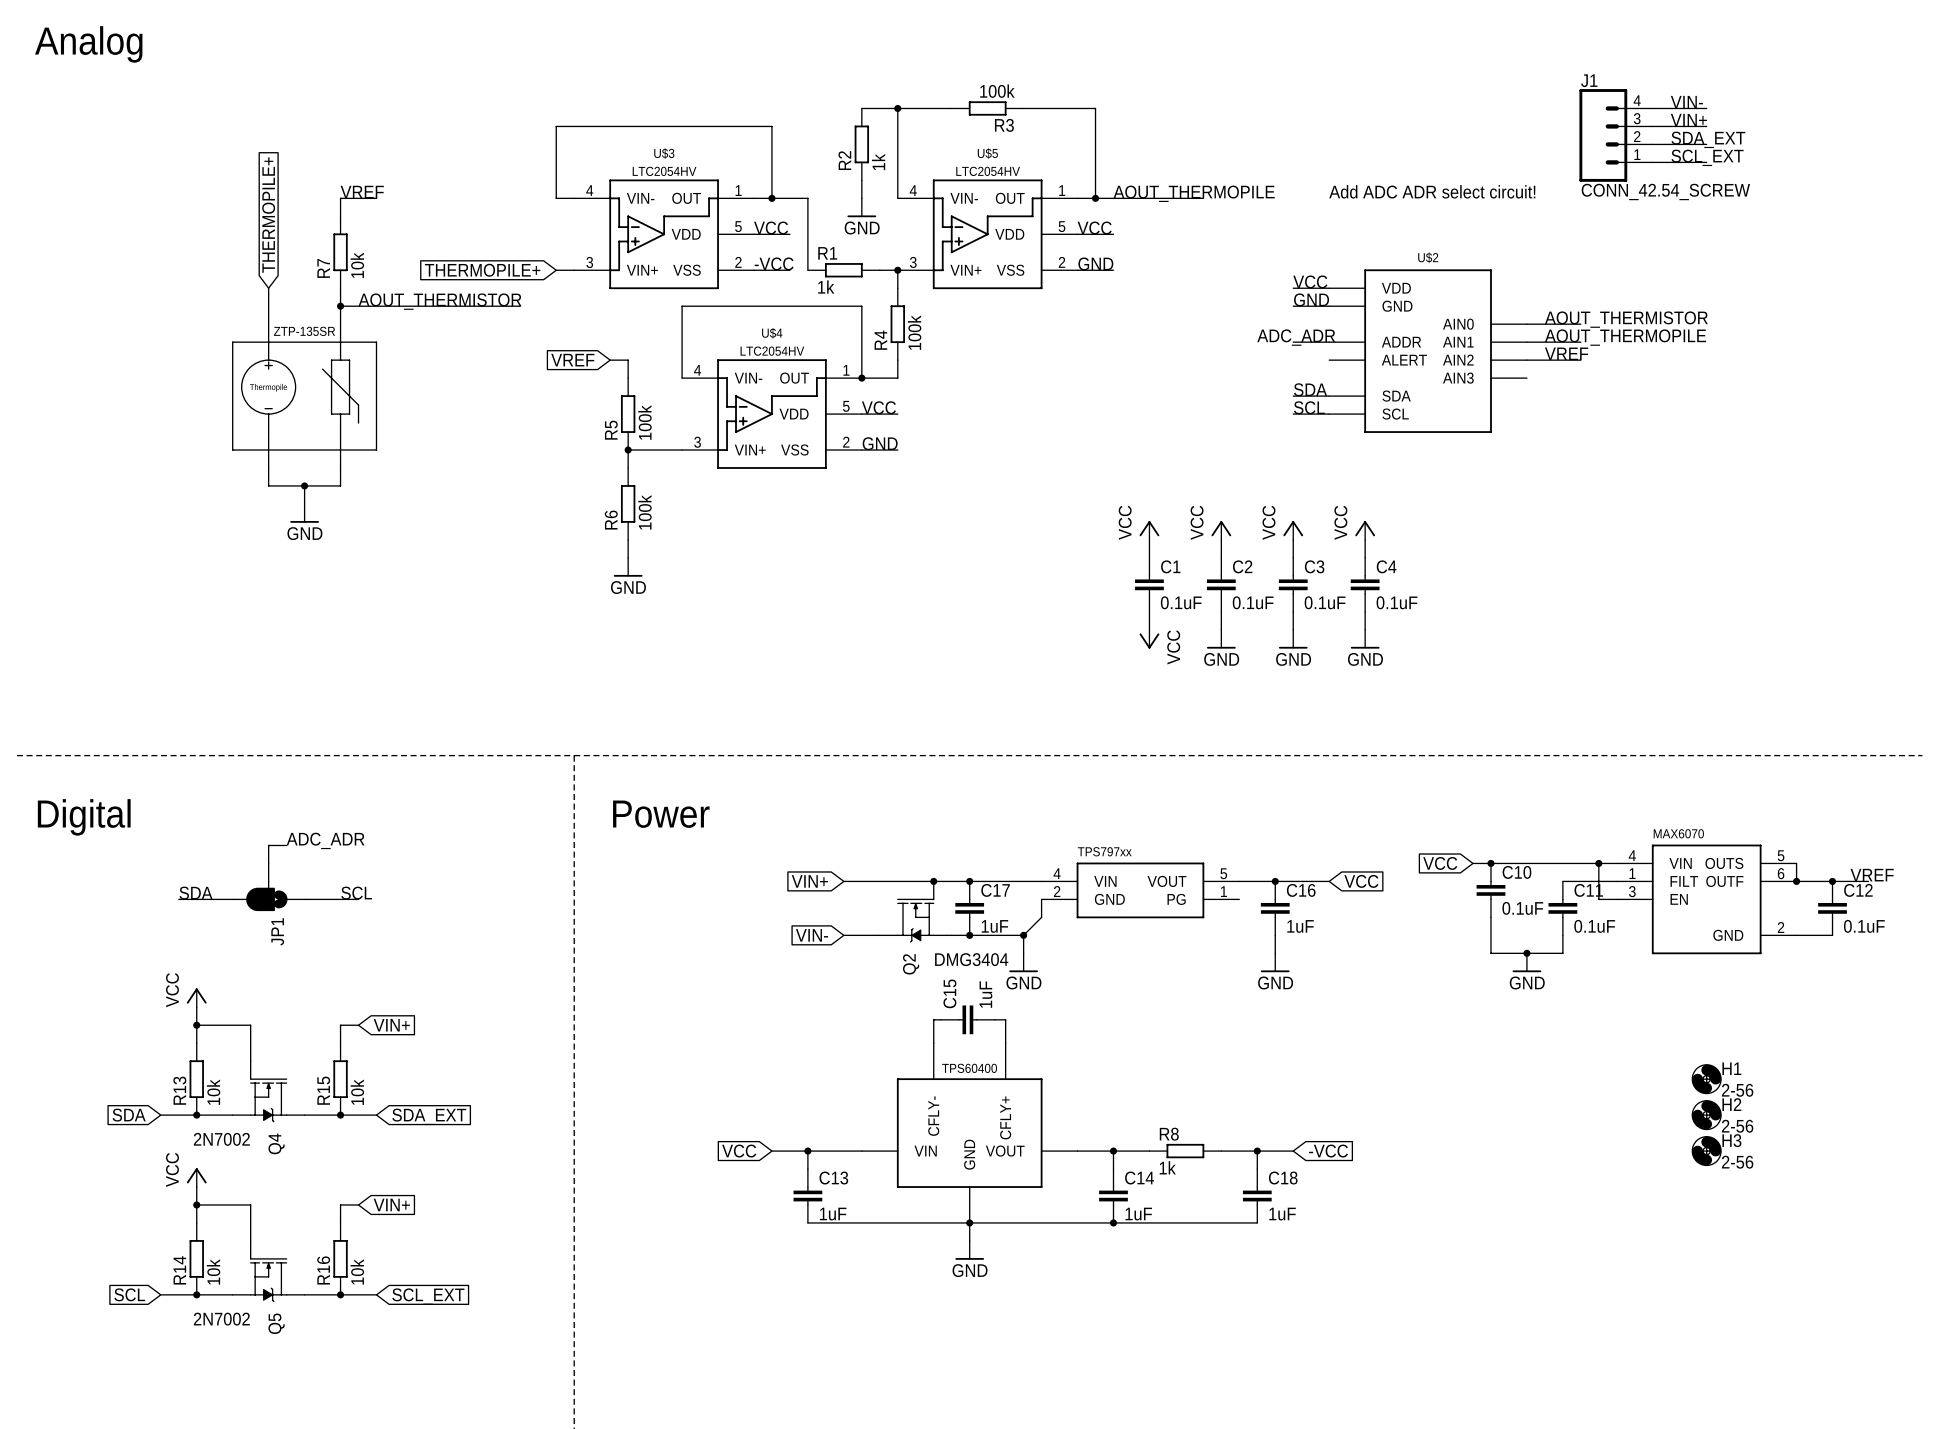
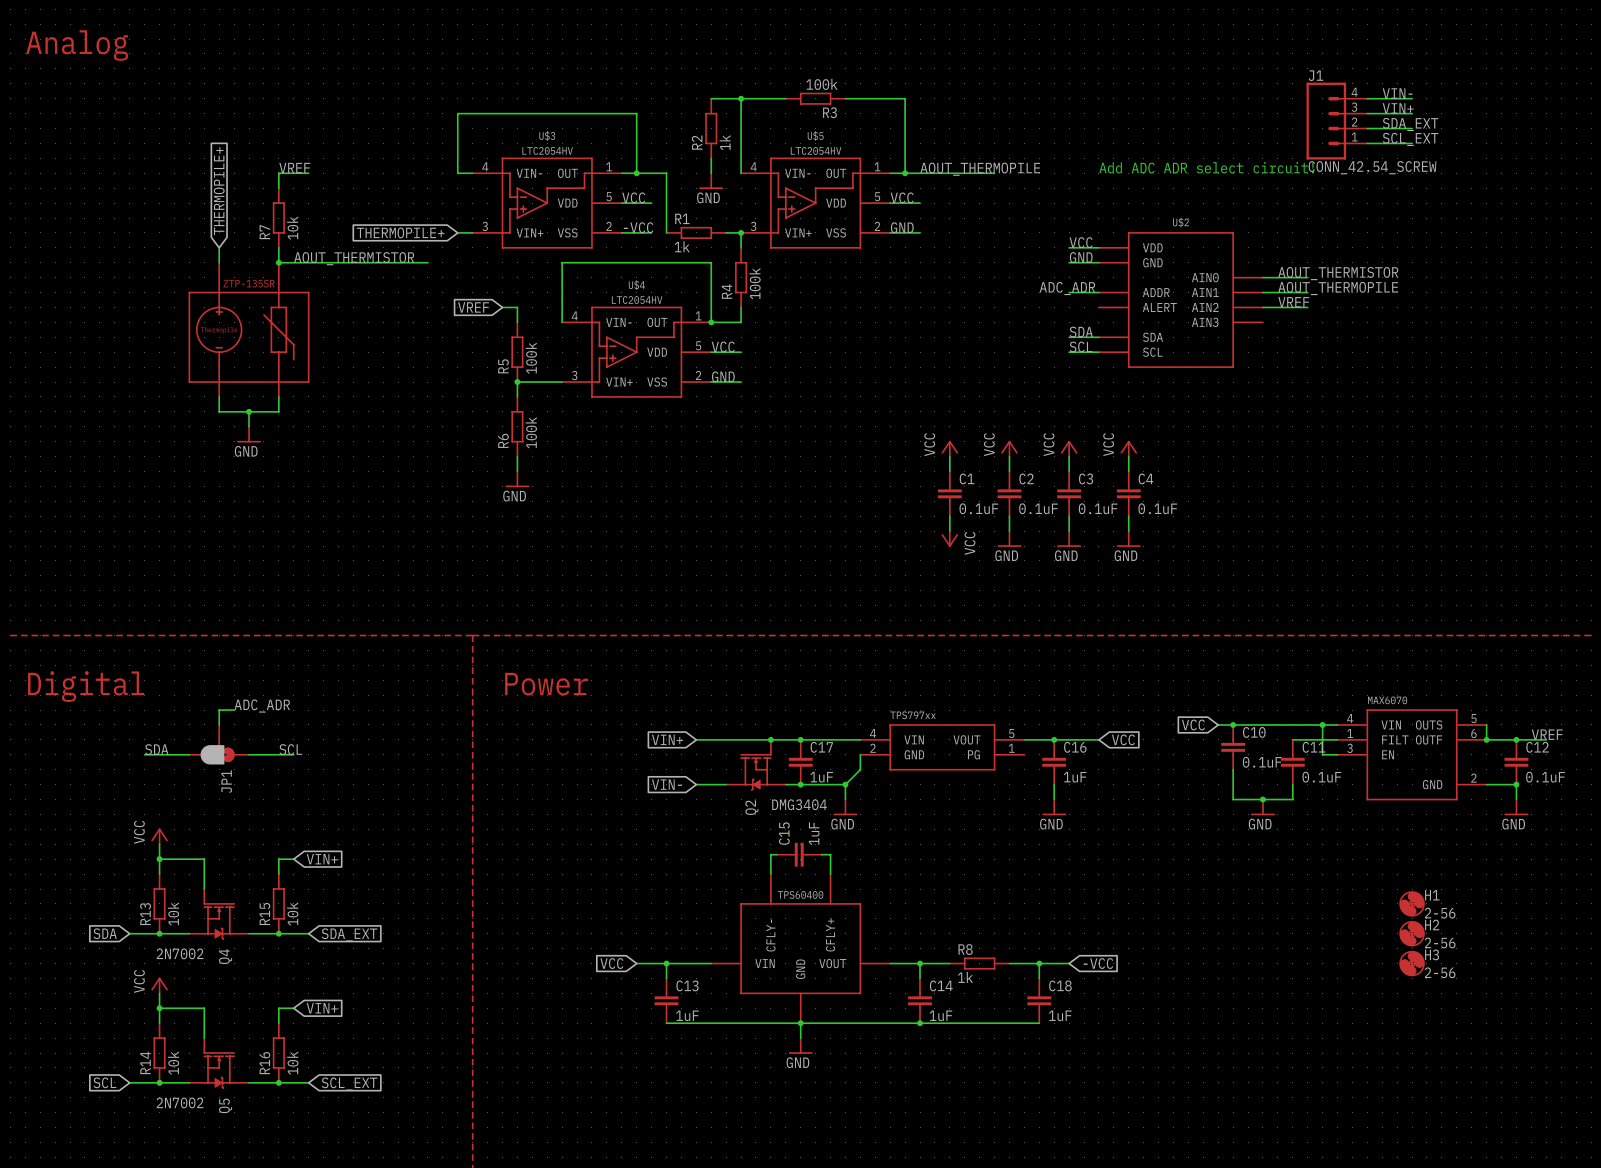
wire: none -> (1516, 784) (1516, 799)
junction: none -> (1516, 784)
power symbol: none -> GND (1516, 807)

